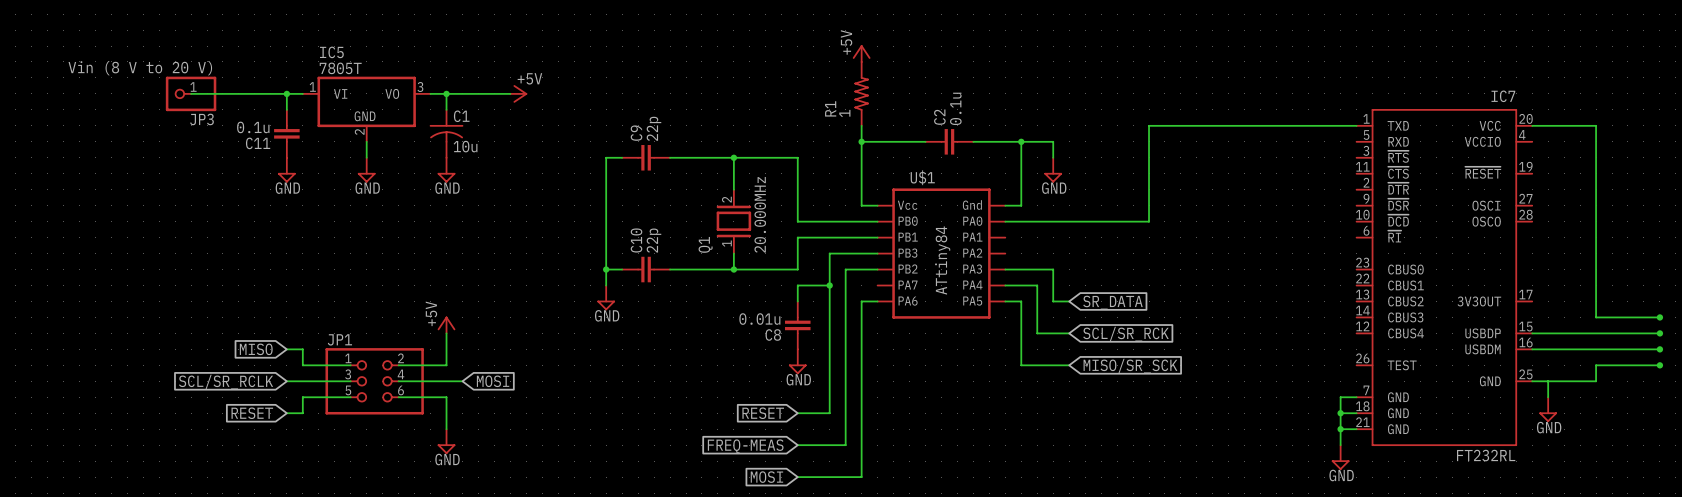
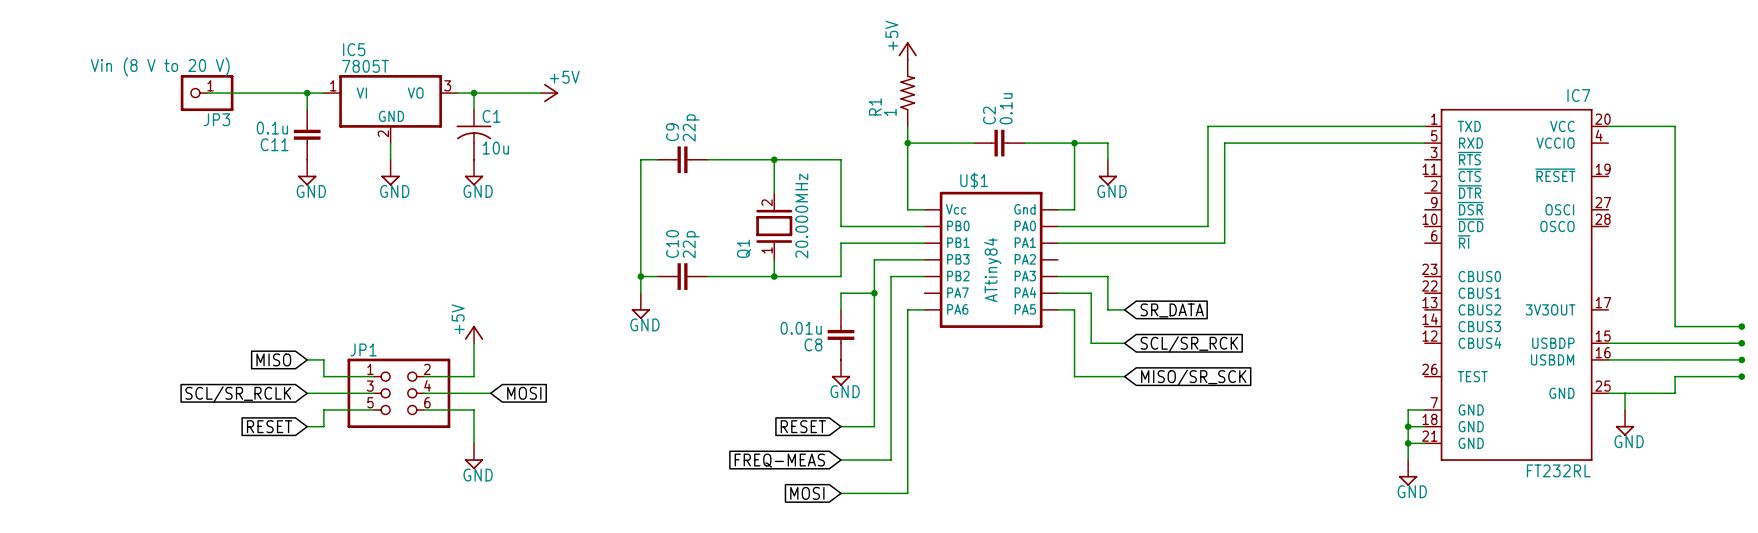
wire: none -> (1424, 143) (1224, 143) (1224, 243) (1057, 243)

